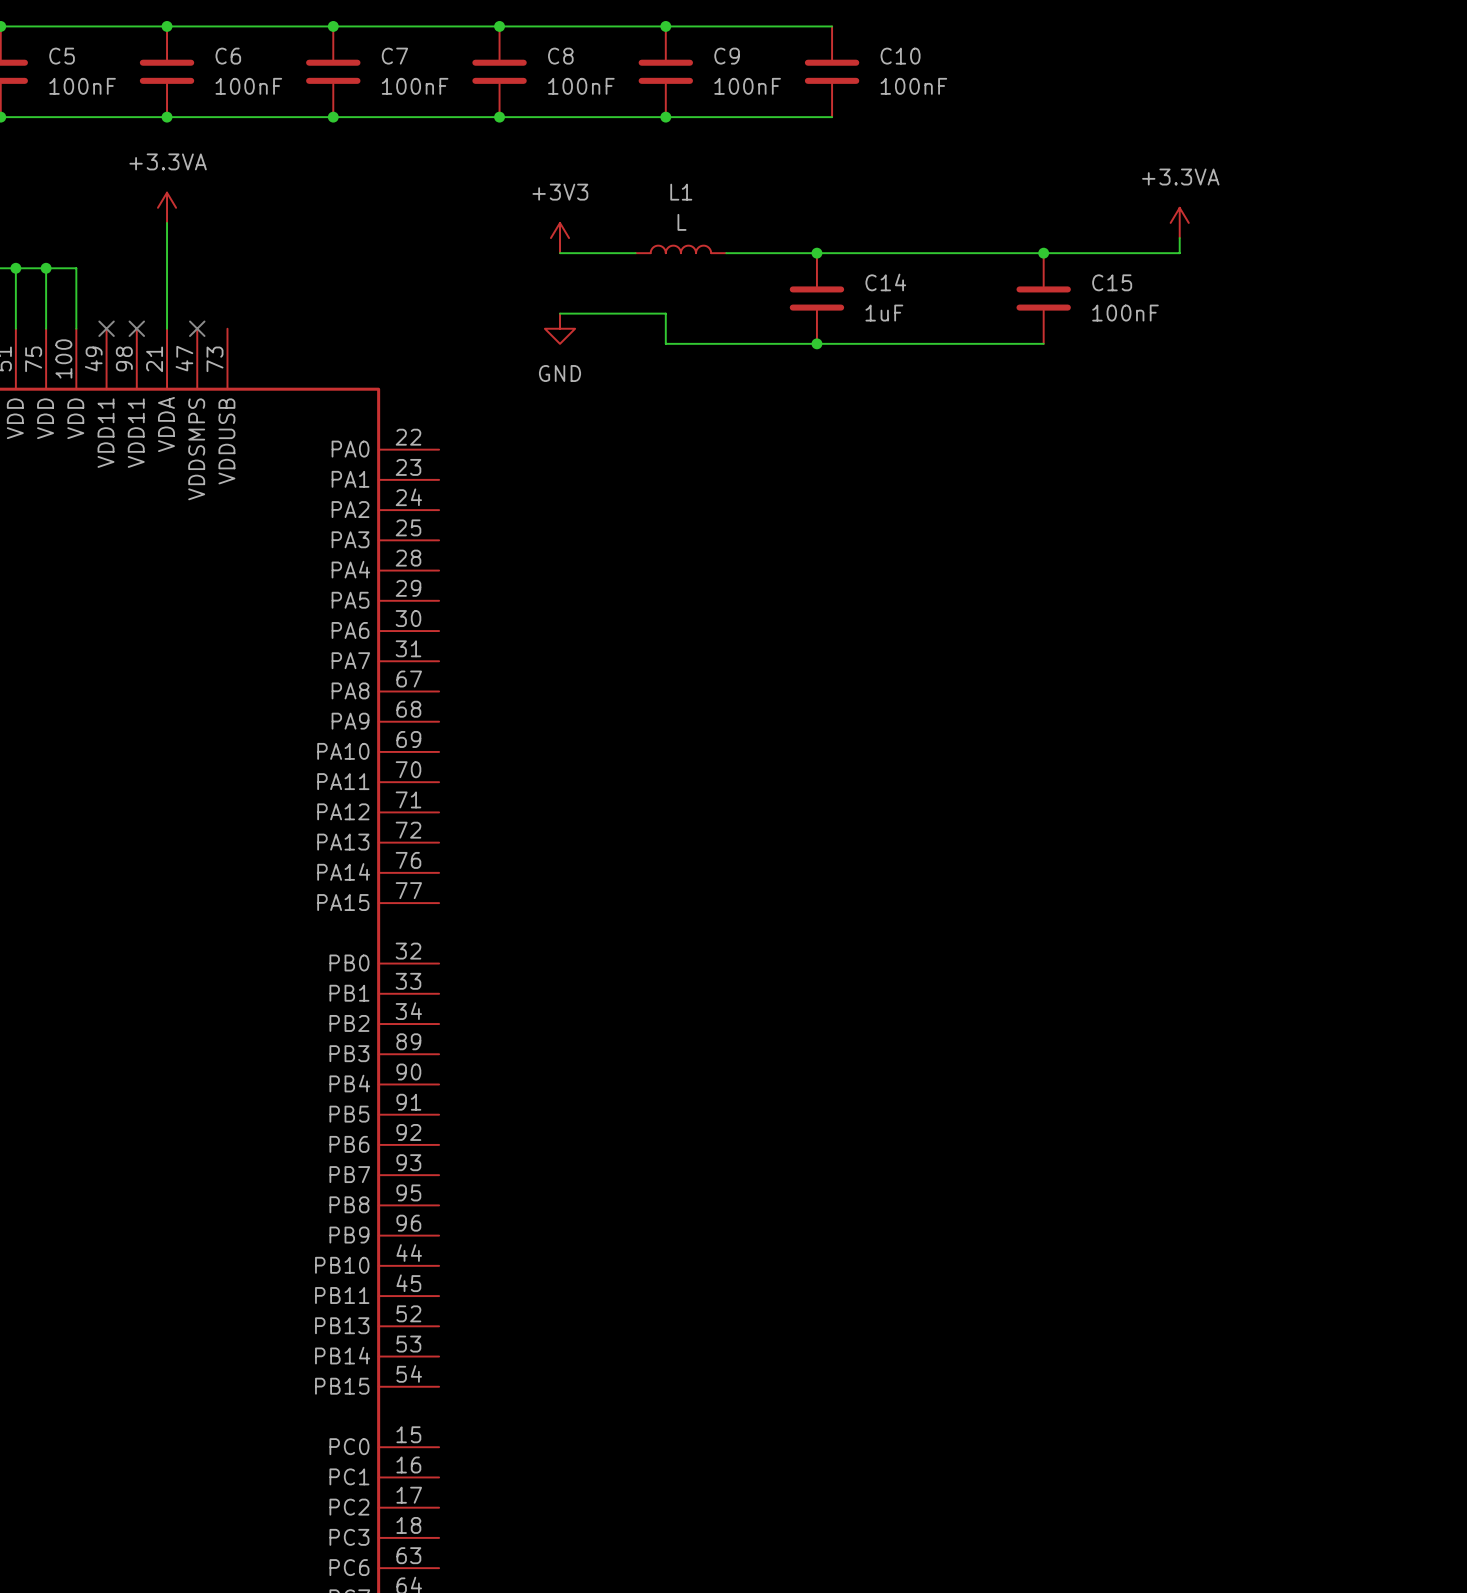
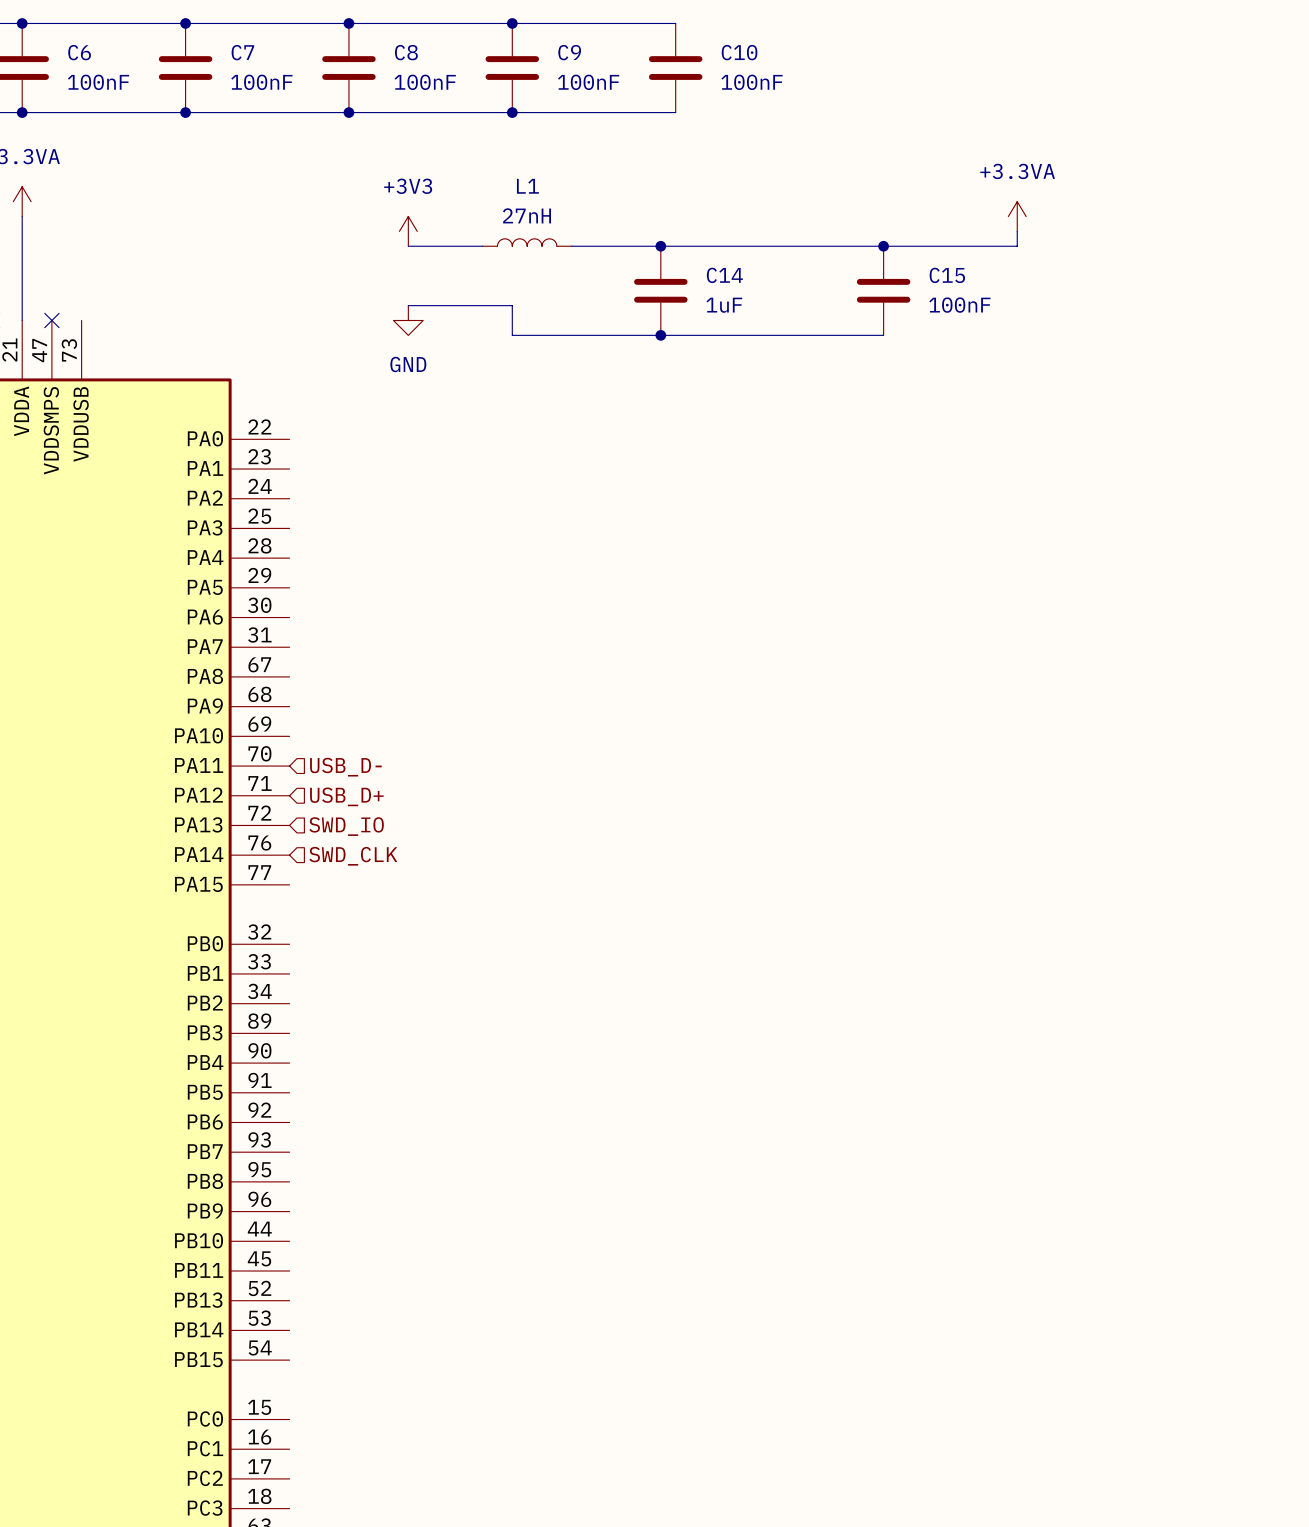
L1 value: L (682, 222) -> 27nH (527, 215)
hierarchical label: none -> USB_D- (345, 767)
hierarchical label: none -> USB_D+ (346, 796)
hierarchical label: none -> SWD_IO (346, 826)
hierarchical label: none -> SWD_CLK (353, 856)

